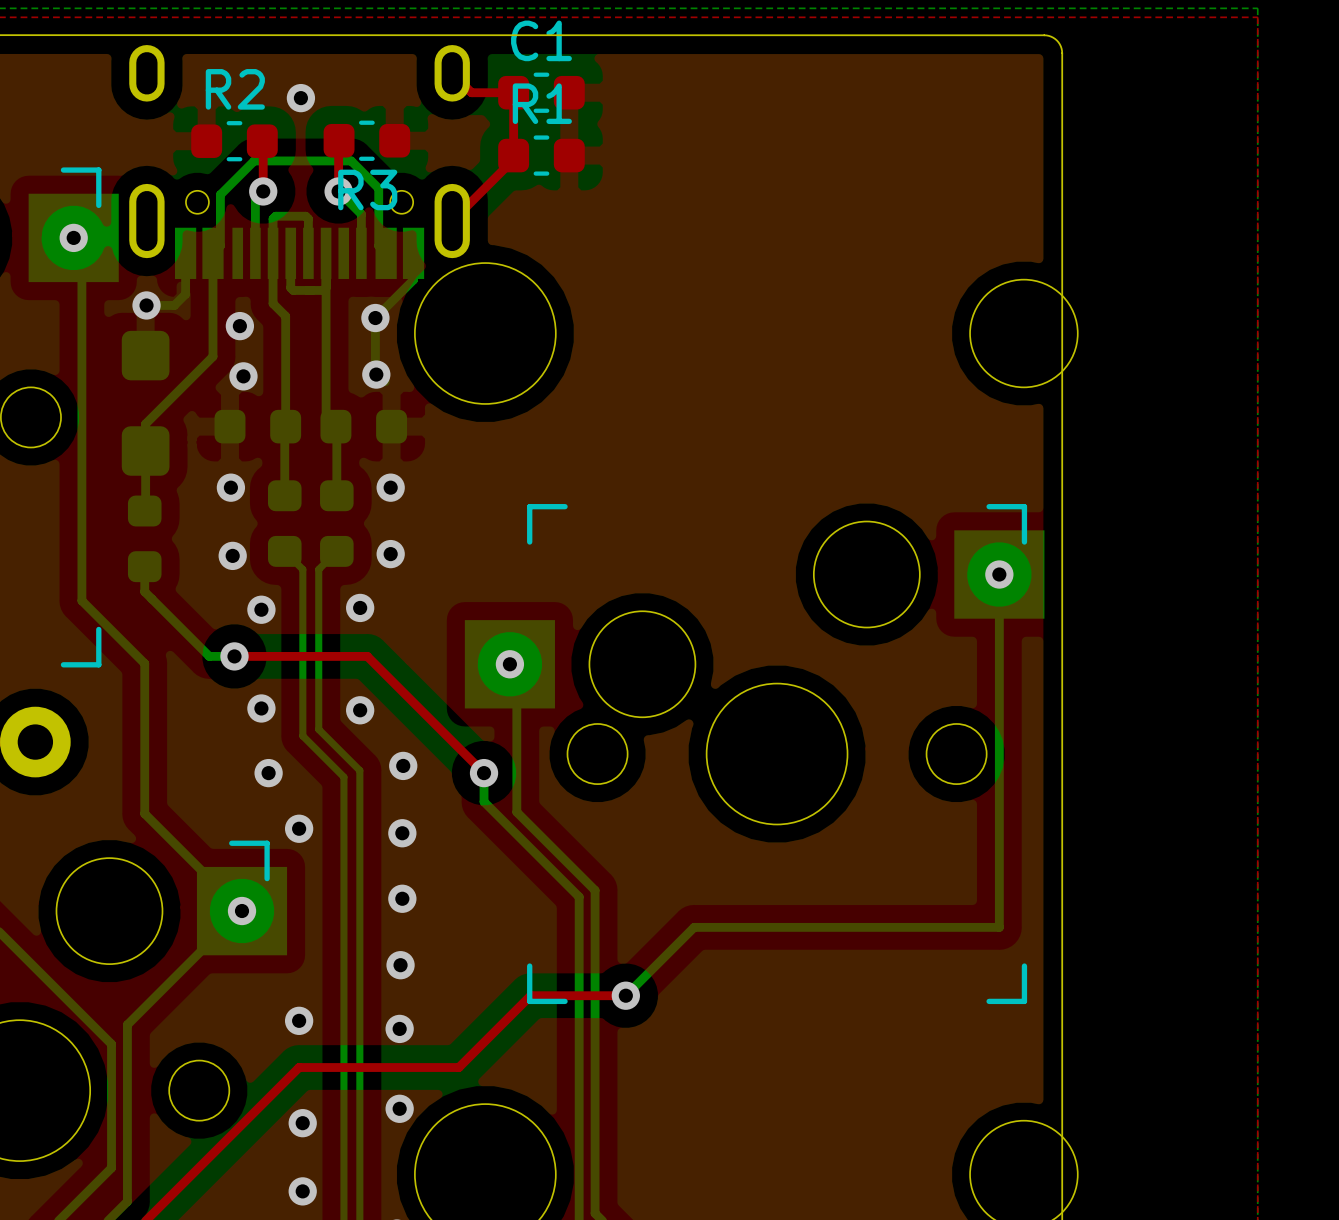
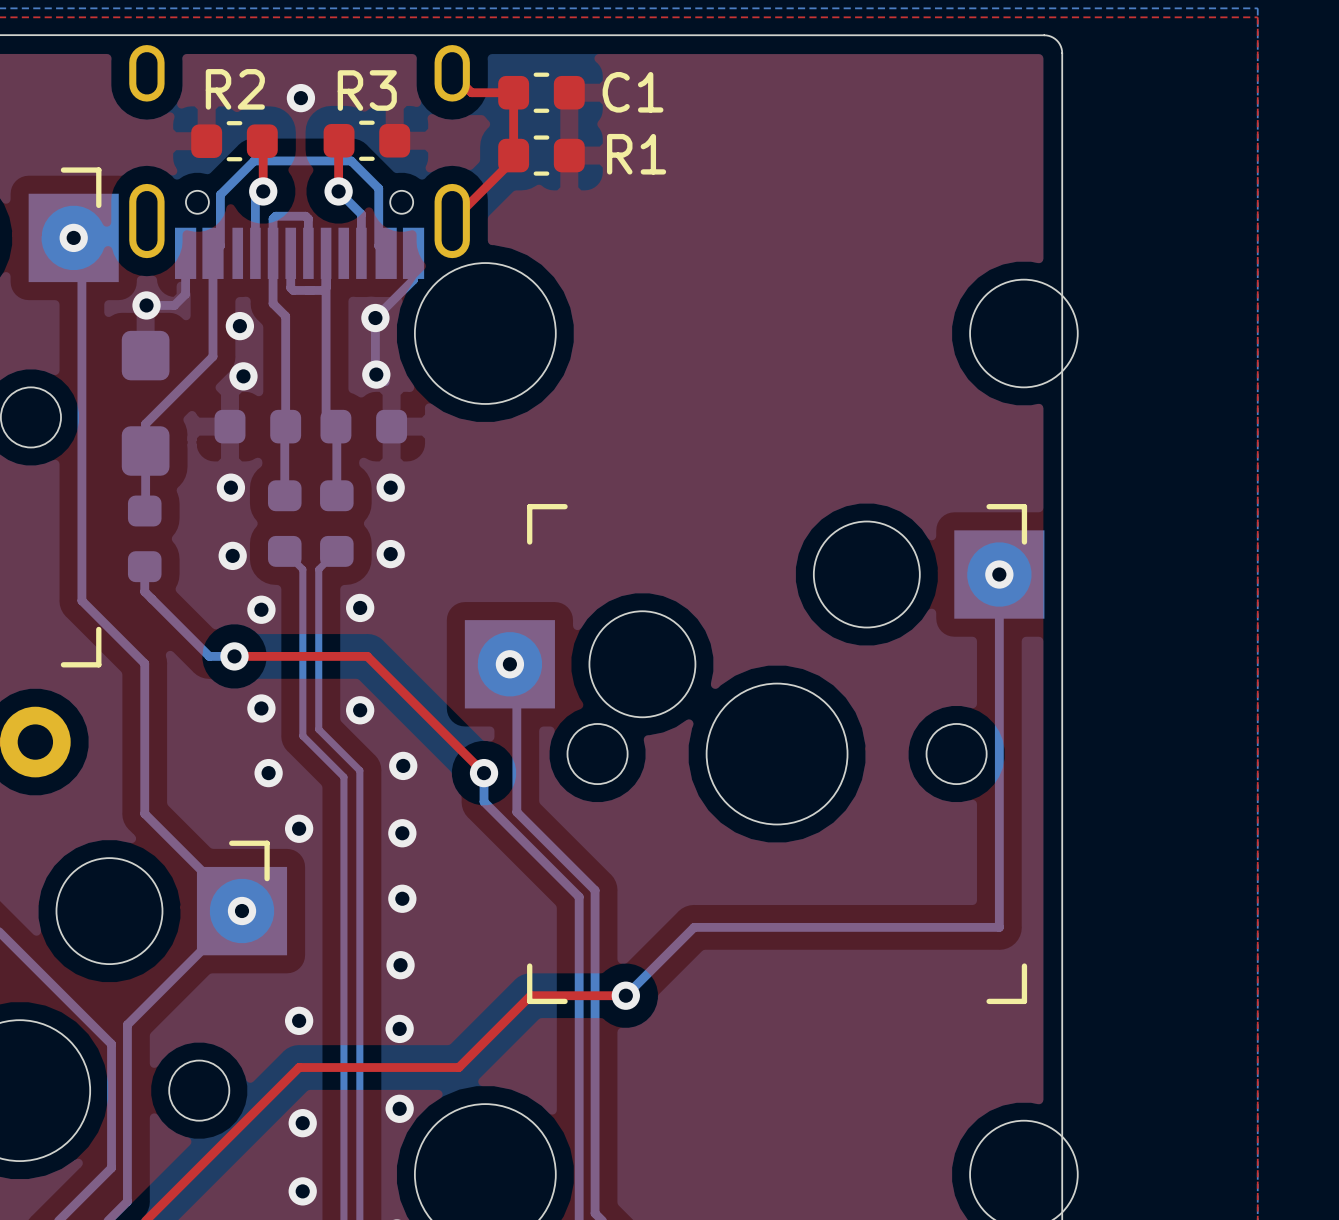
C1 name position: C1 (541, 40) -> C1 (633, 92)
R1 name position: R1 (542, 103) -> R1 (636, 154)
R3 name position: R3 (367, 189) -> R3 (367, 90)

